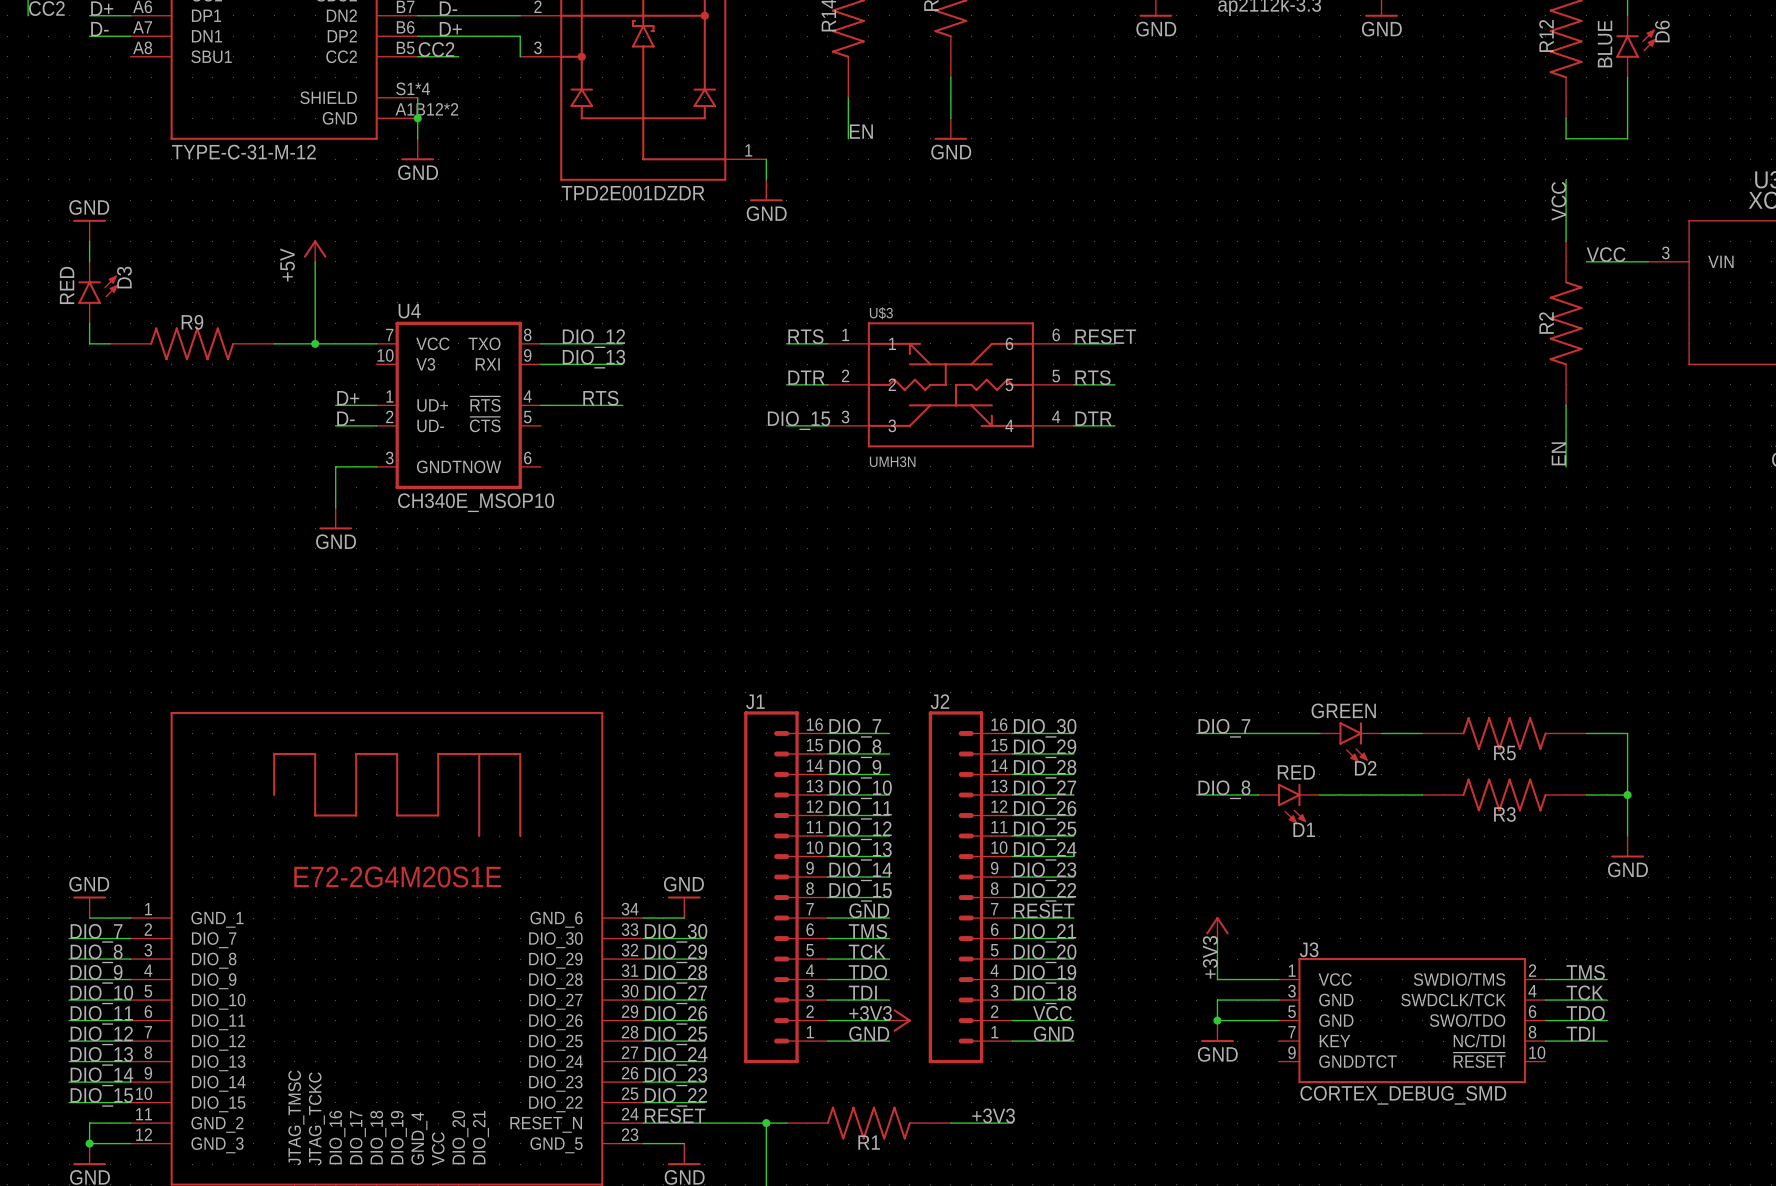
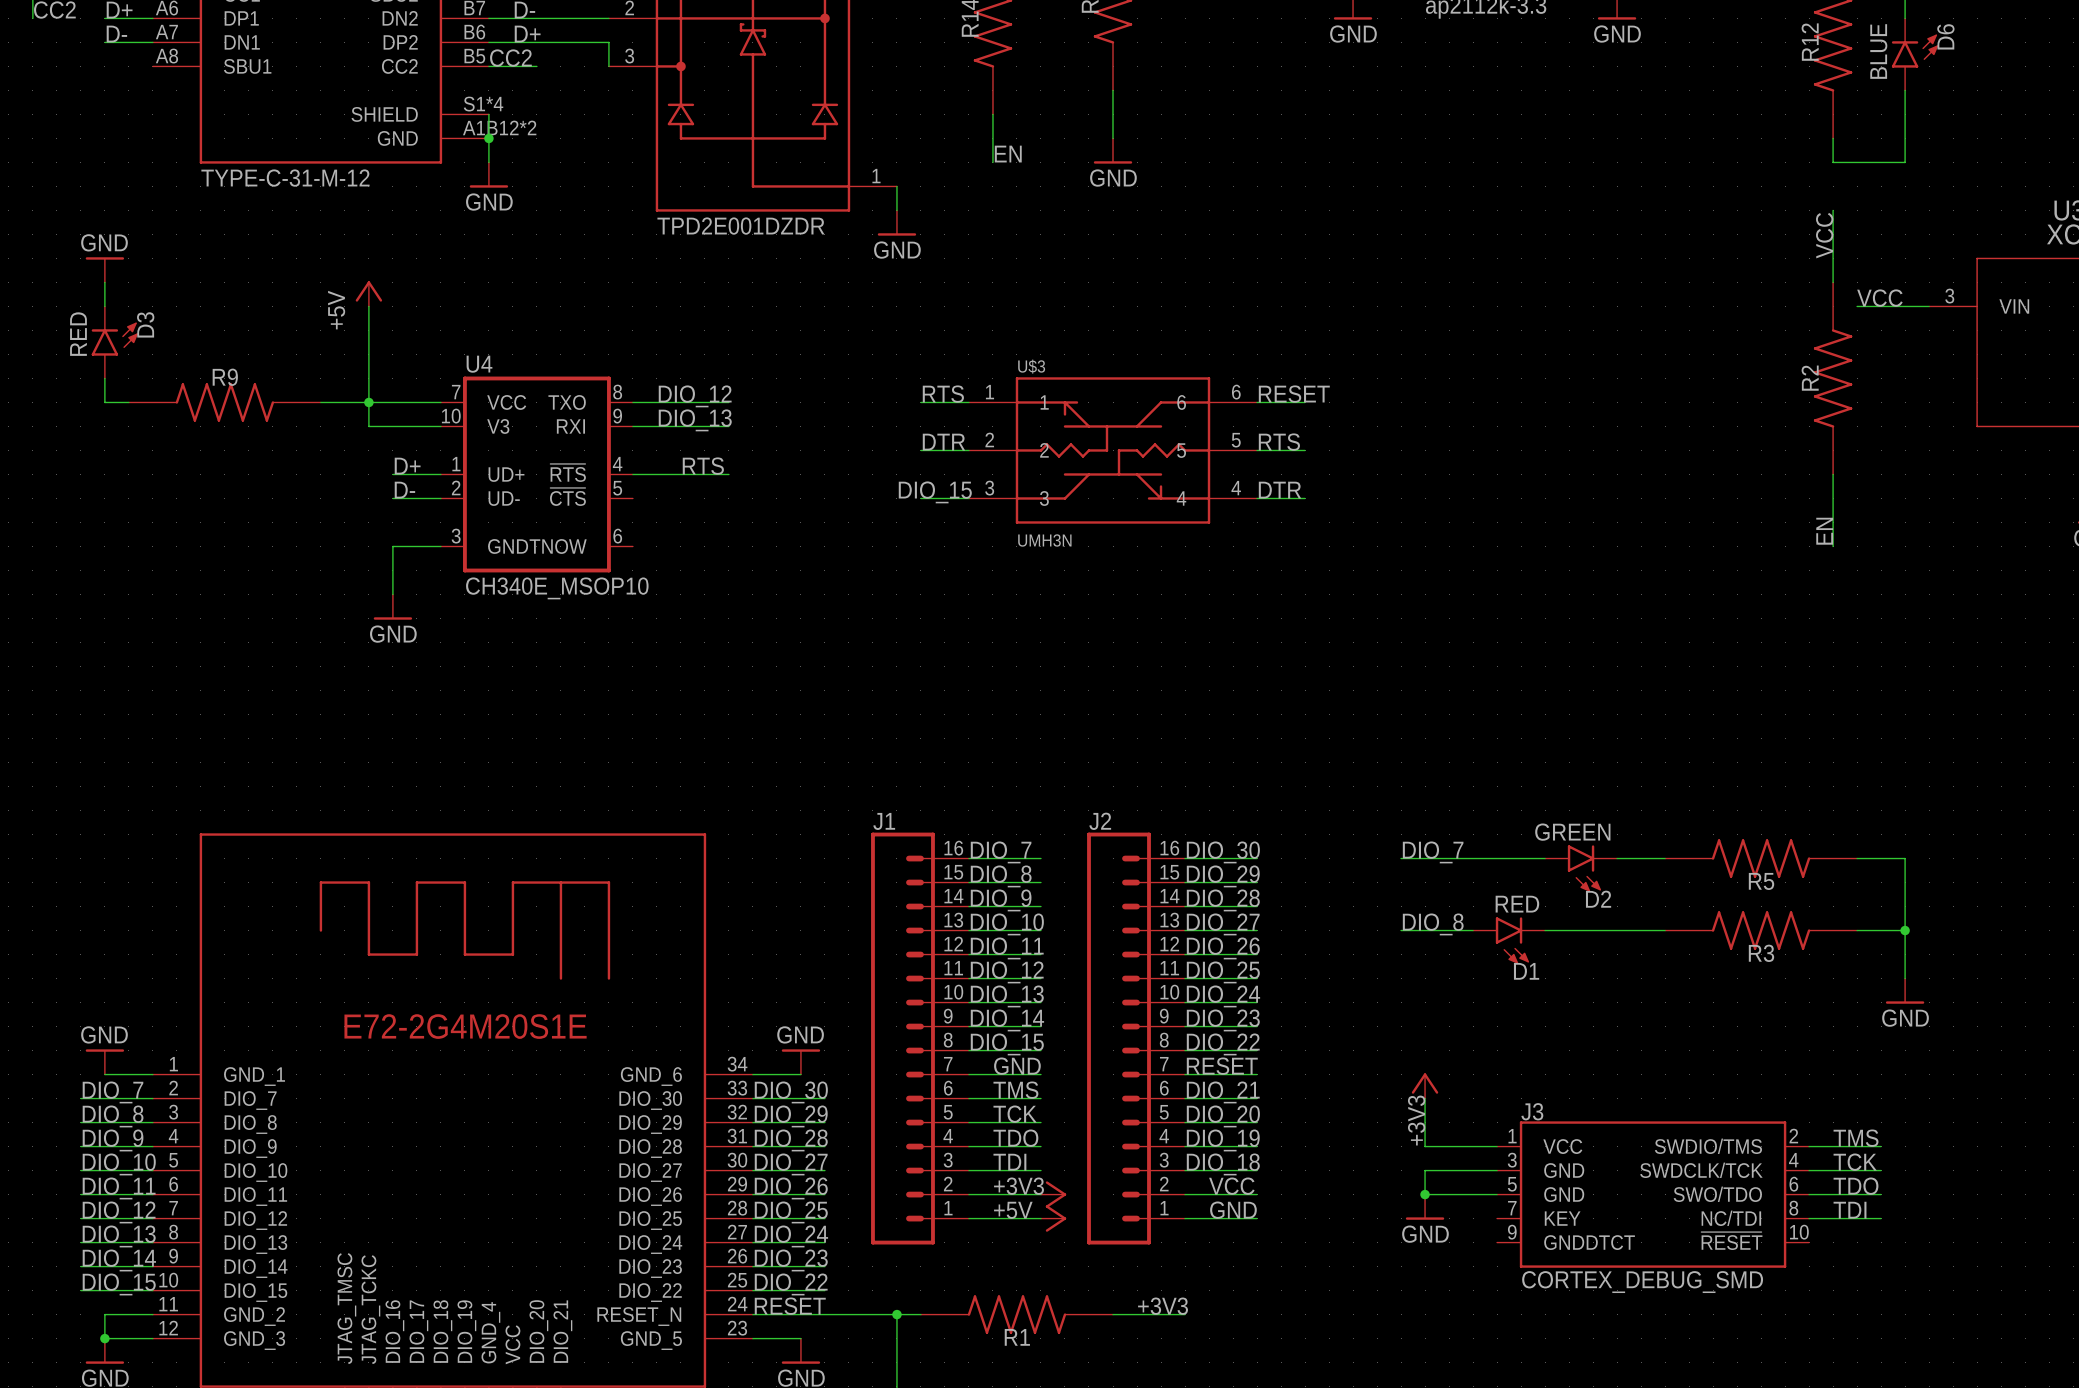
wire: none -> (368, 402) (368, 426) (440, 426)
label: GND (869, 1033) -> none
power symbol: none -> +5V (1053, 1218)

